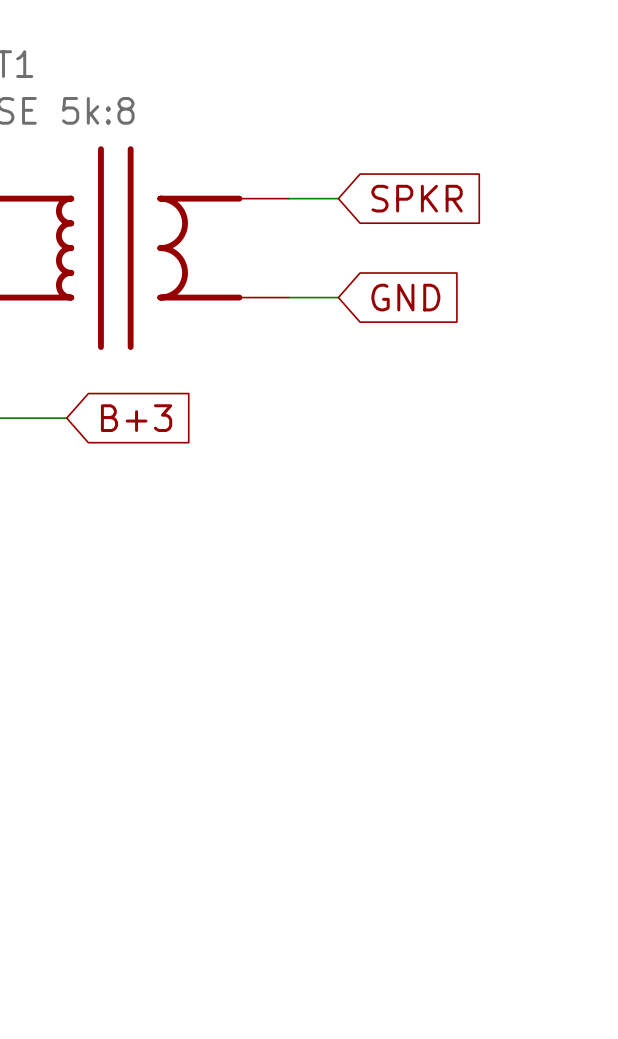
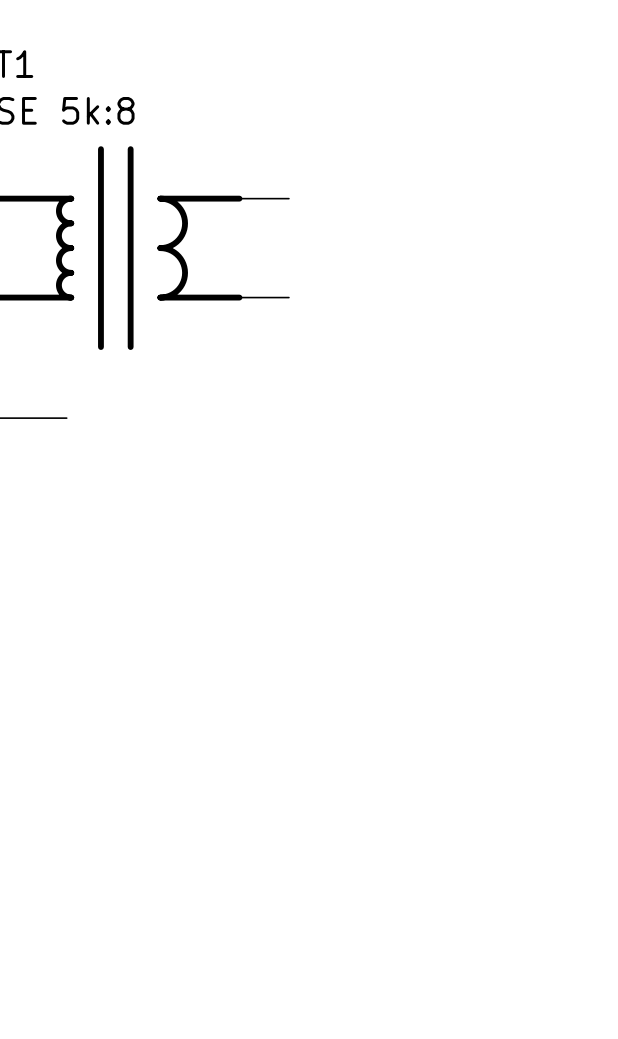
wire: (288, 198) (338, 198) -> none
global label: SPKR (417, 198) -> none
wire: (288, 297) (338, 297) -> none
global label: GND (405, 297) -> none
global label: B+3 (136, 418) -> none

